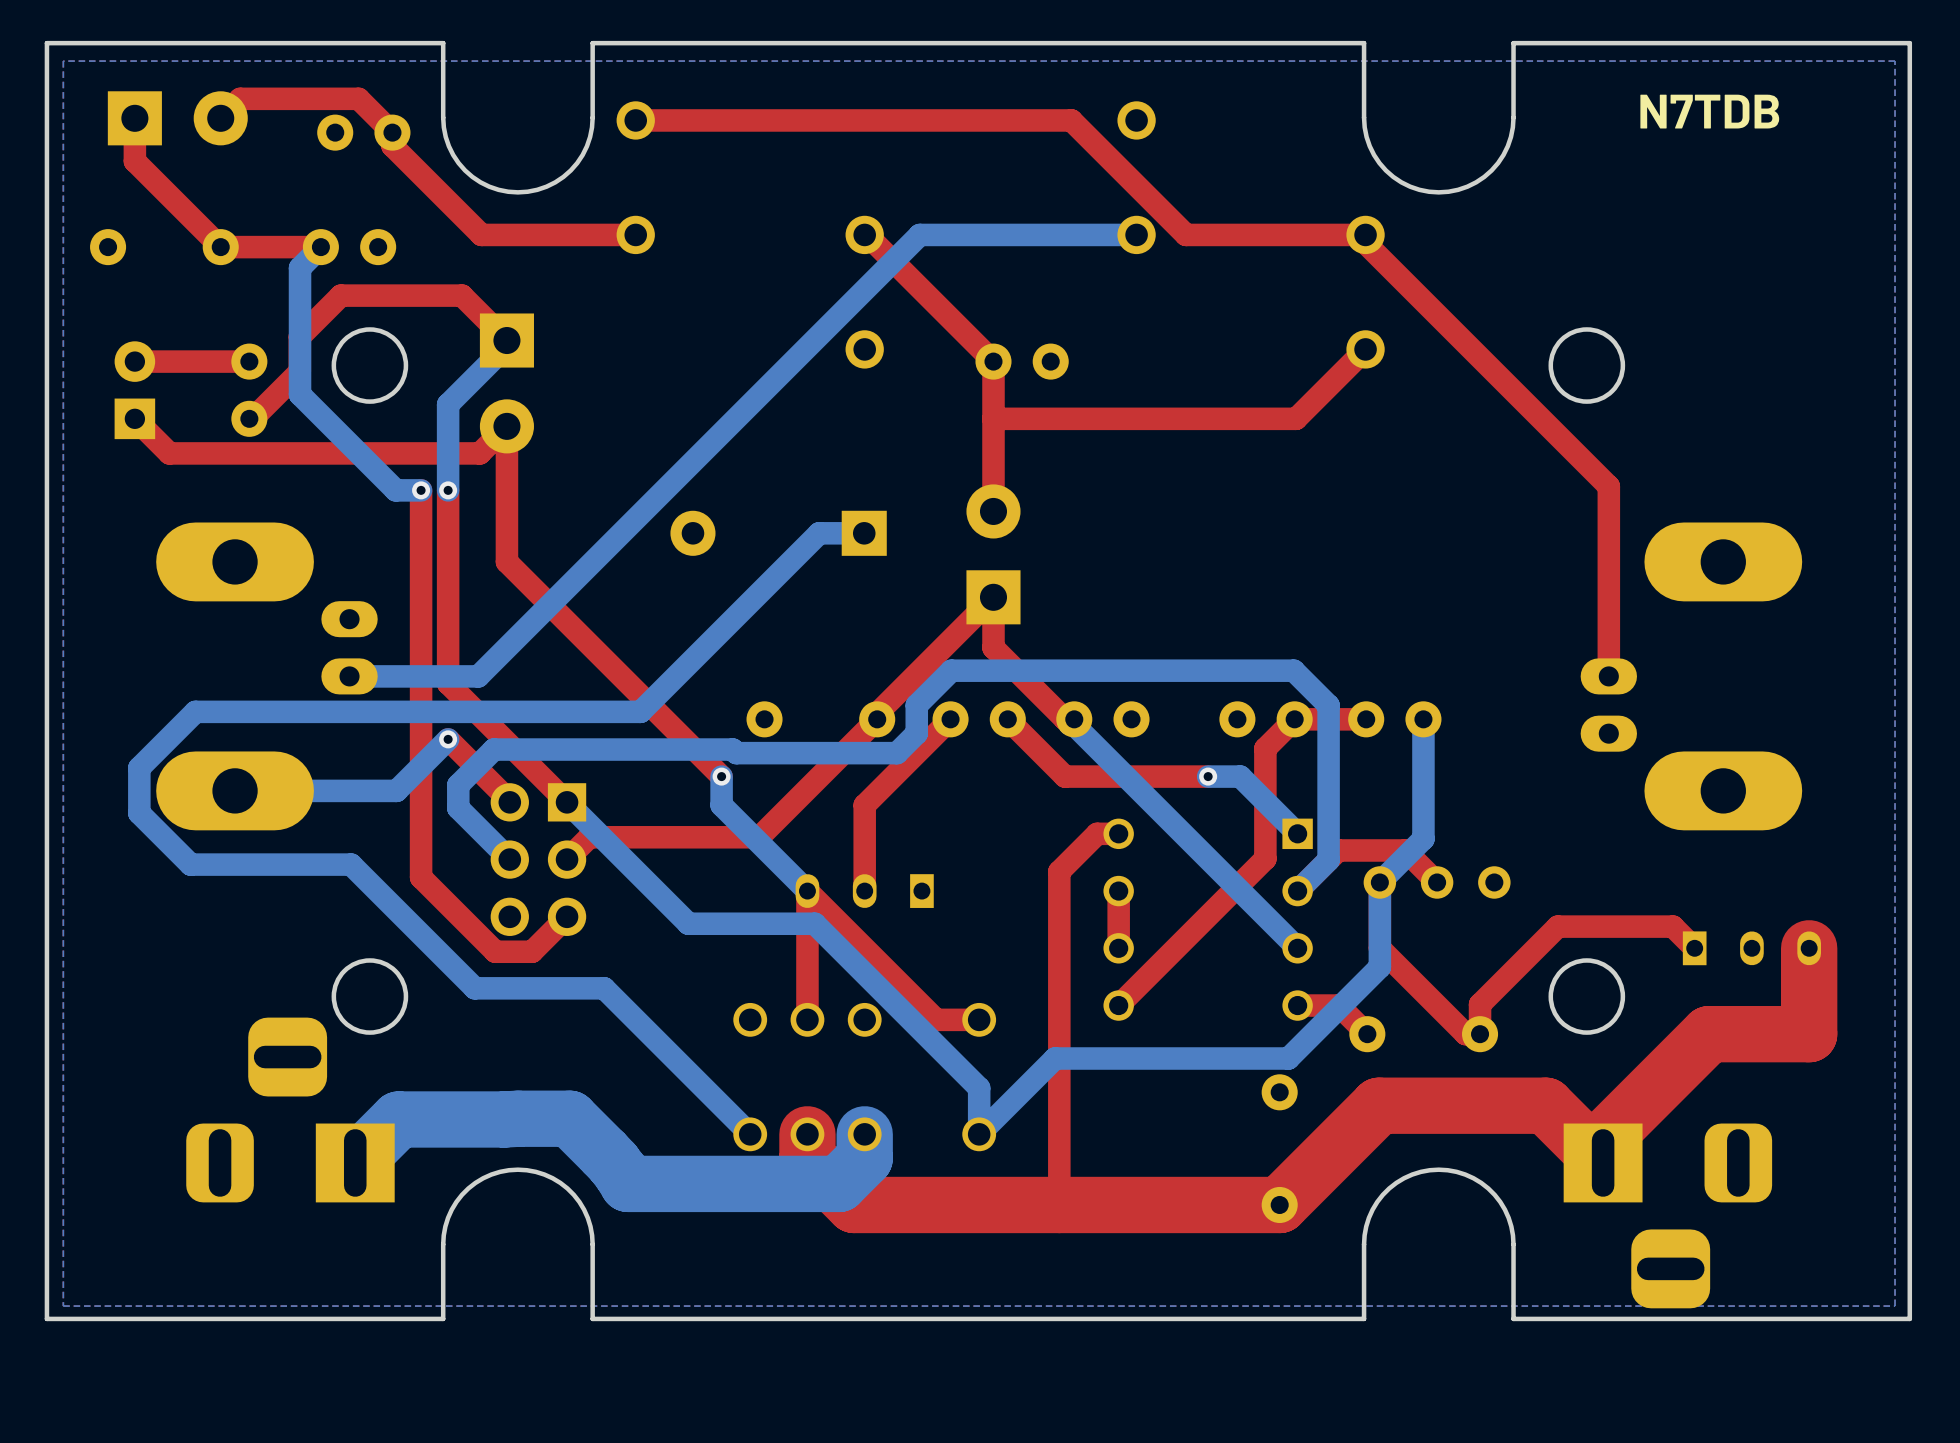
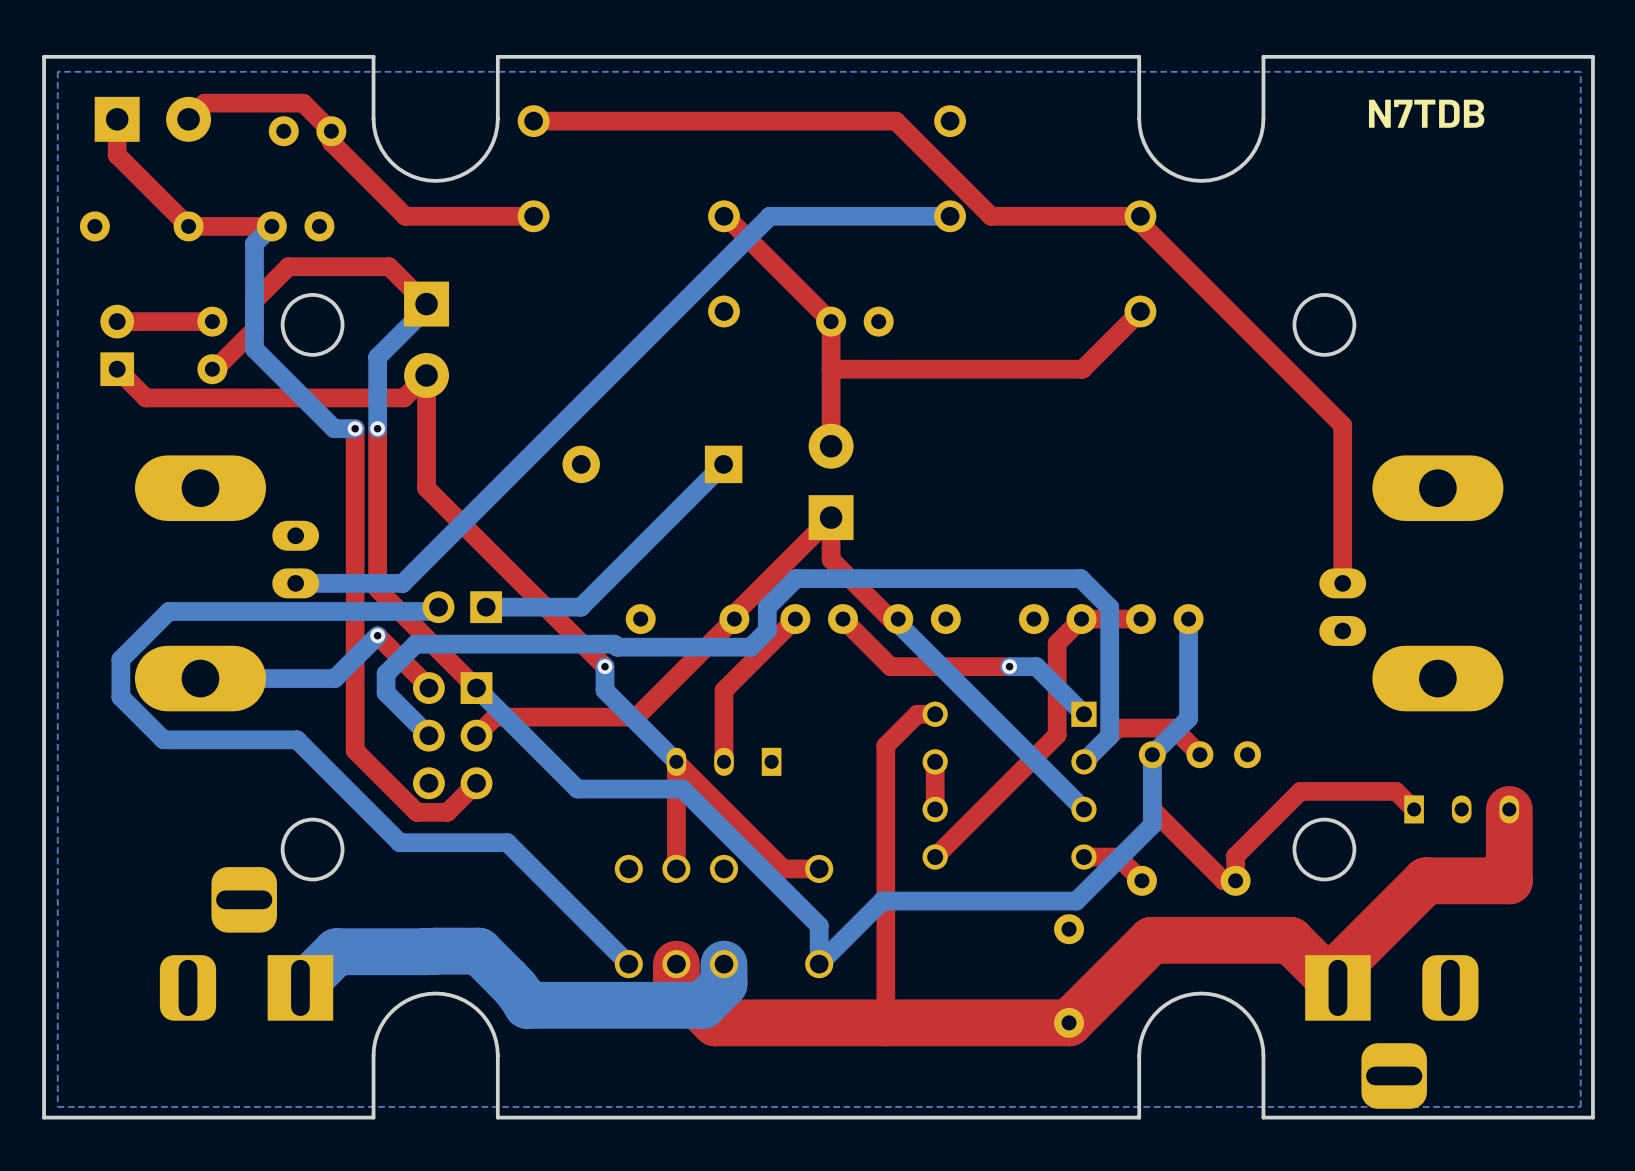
bottom track: (864, 533) (819, 533) (640, 711) (195, 711) -> (723, 464) (580, 607) (486, 607)
bottom track: none -> (438, 607) (434, 611) (167, 612)
part: none -> (462, 607)

